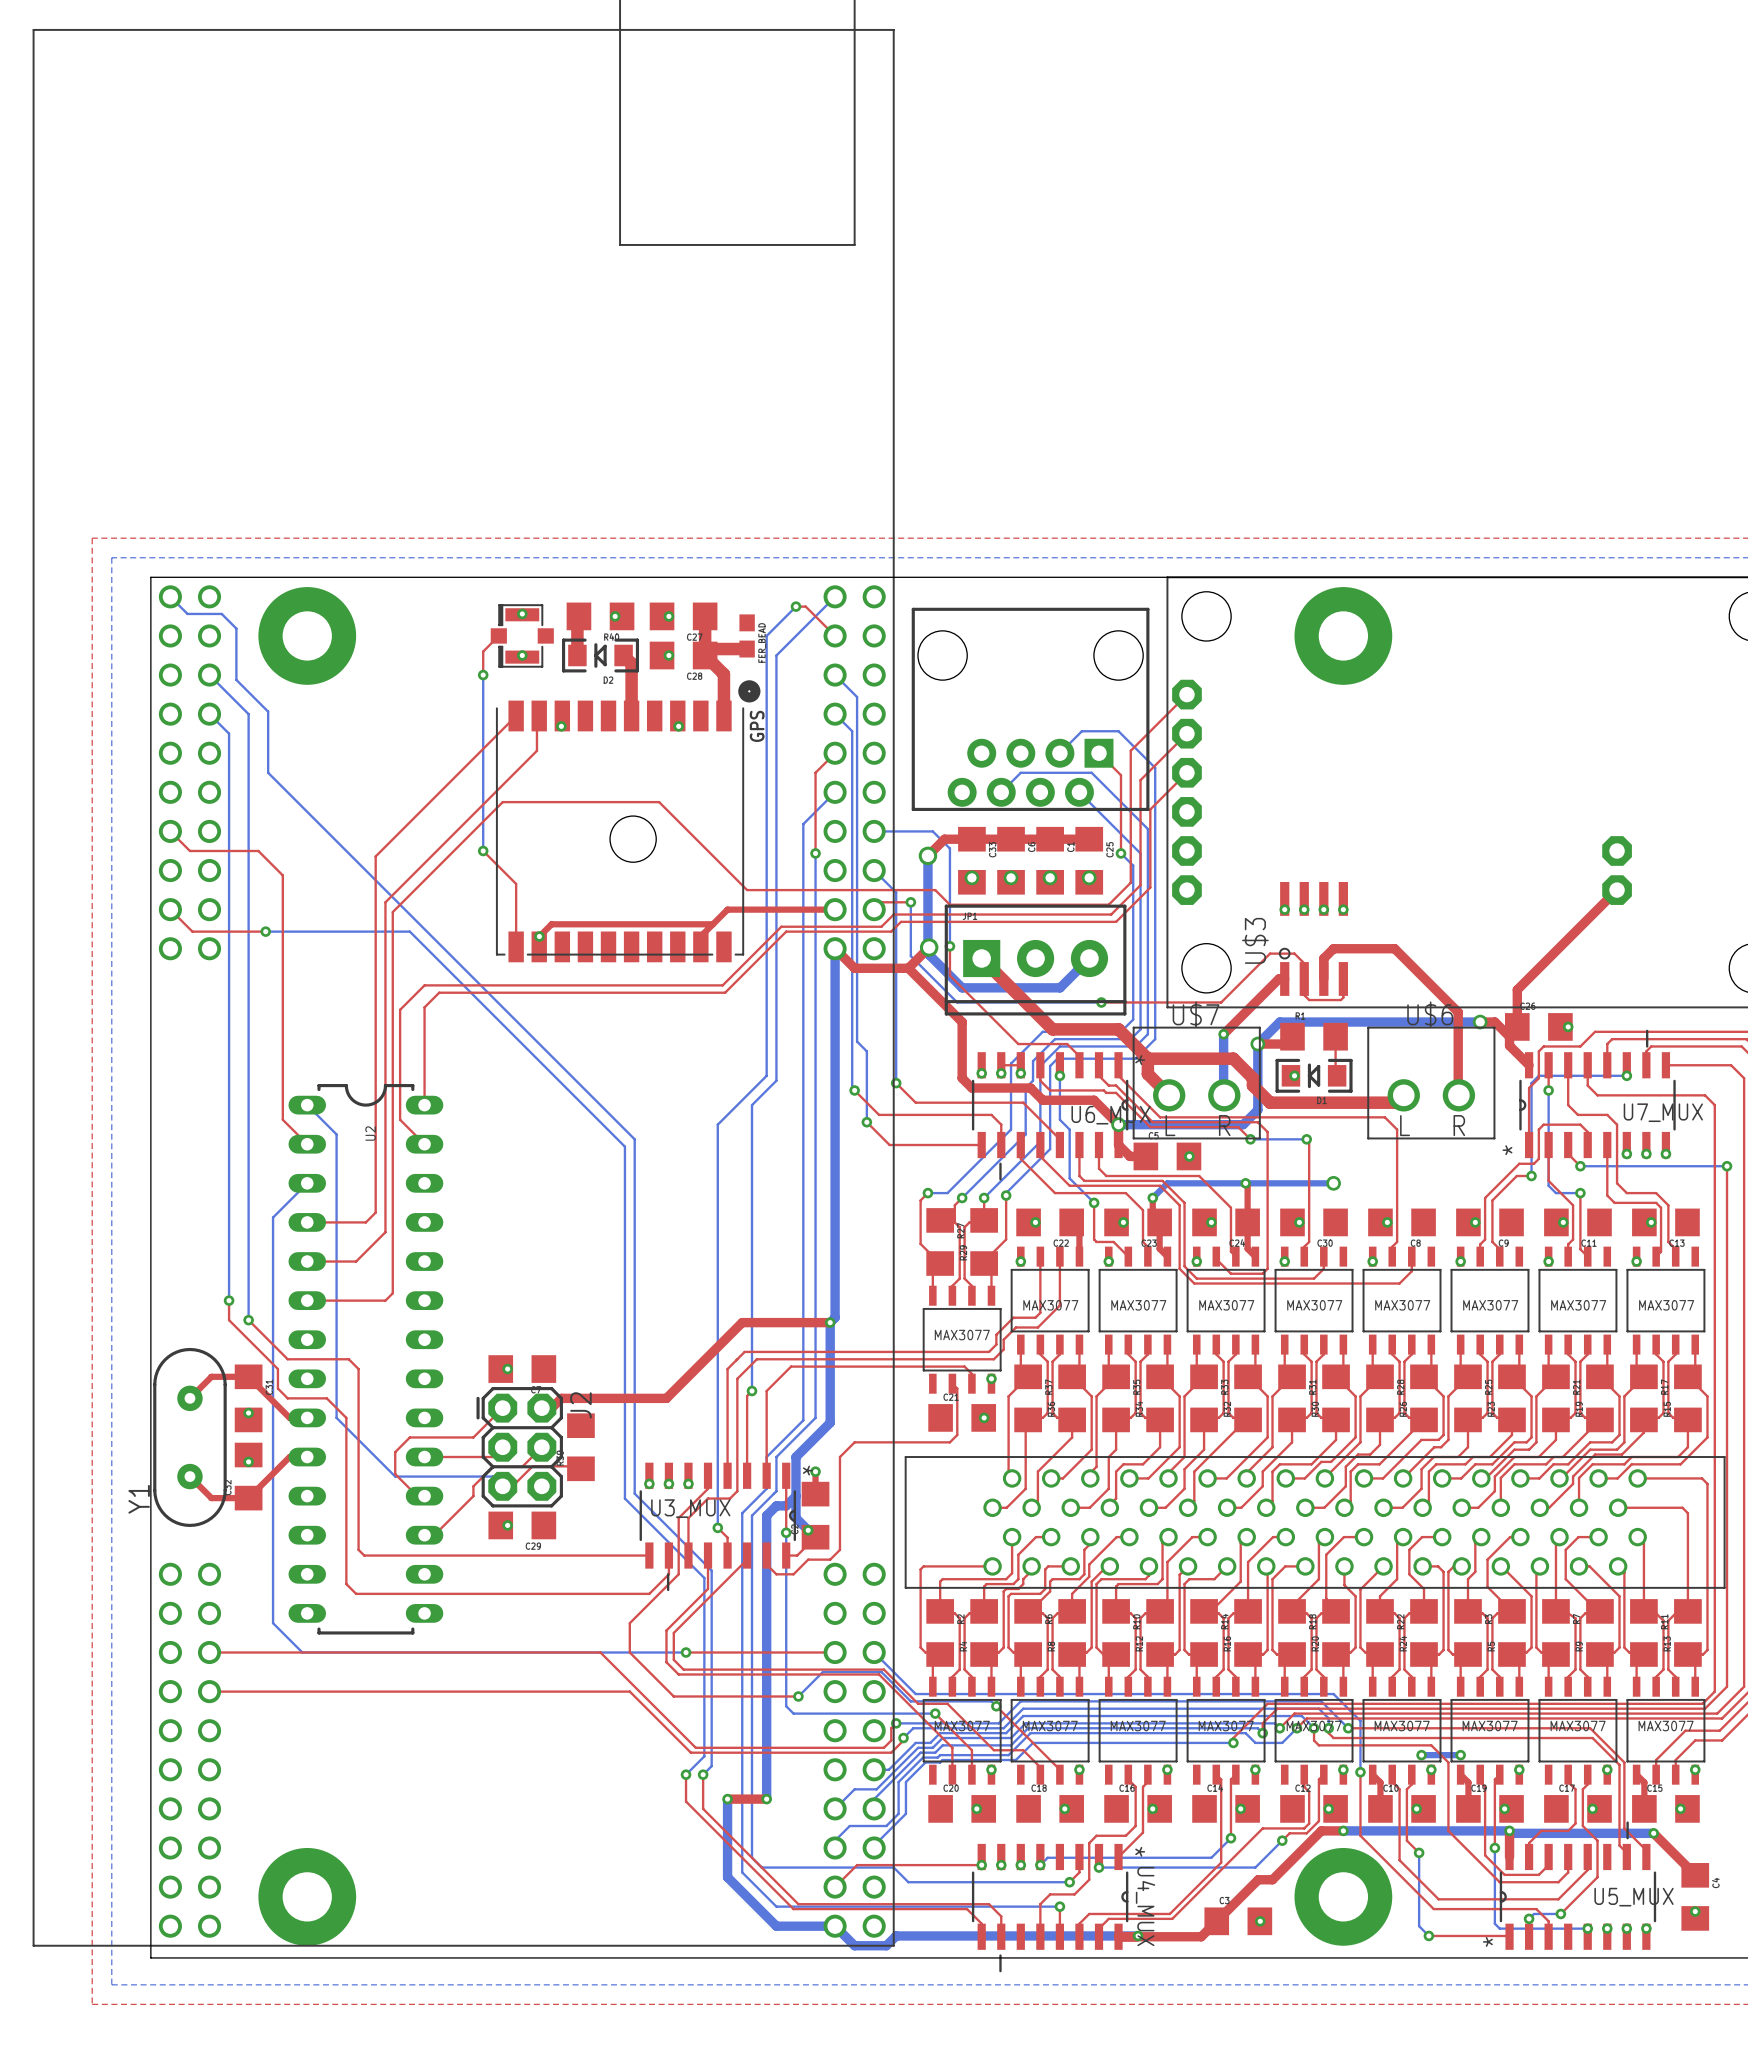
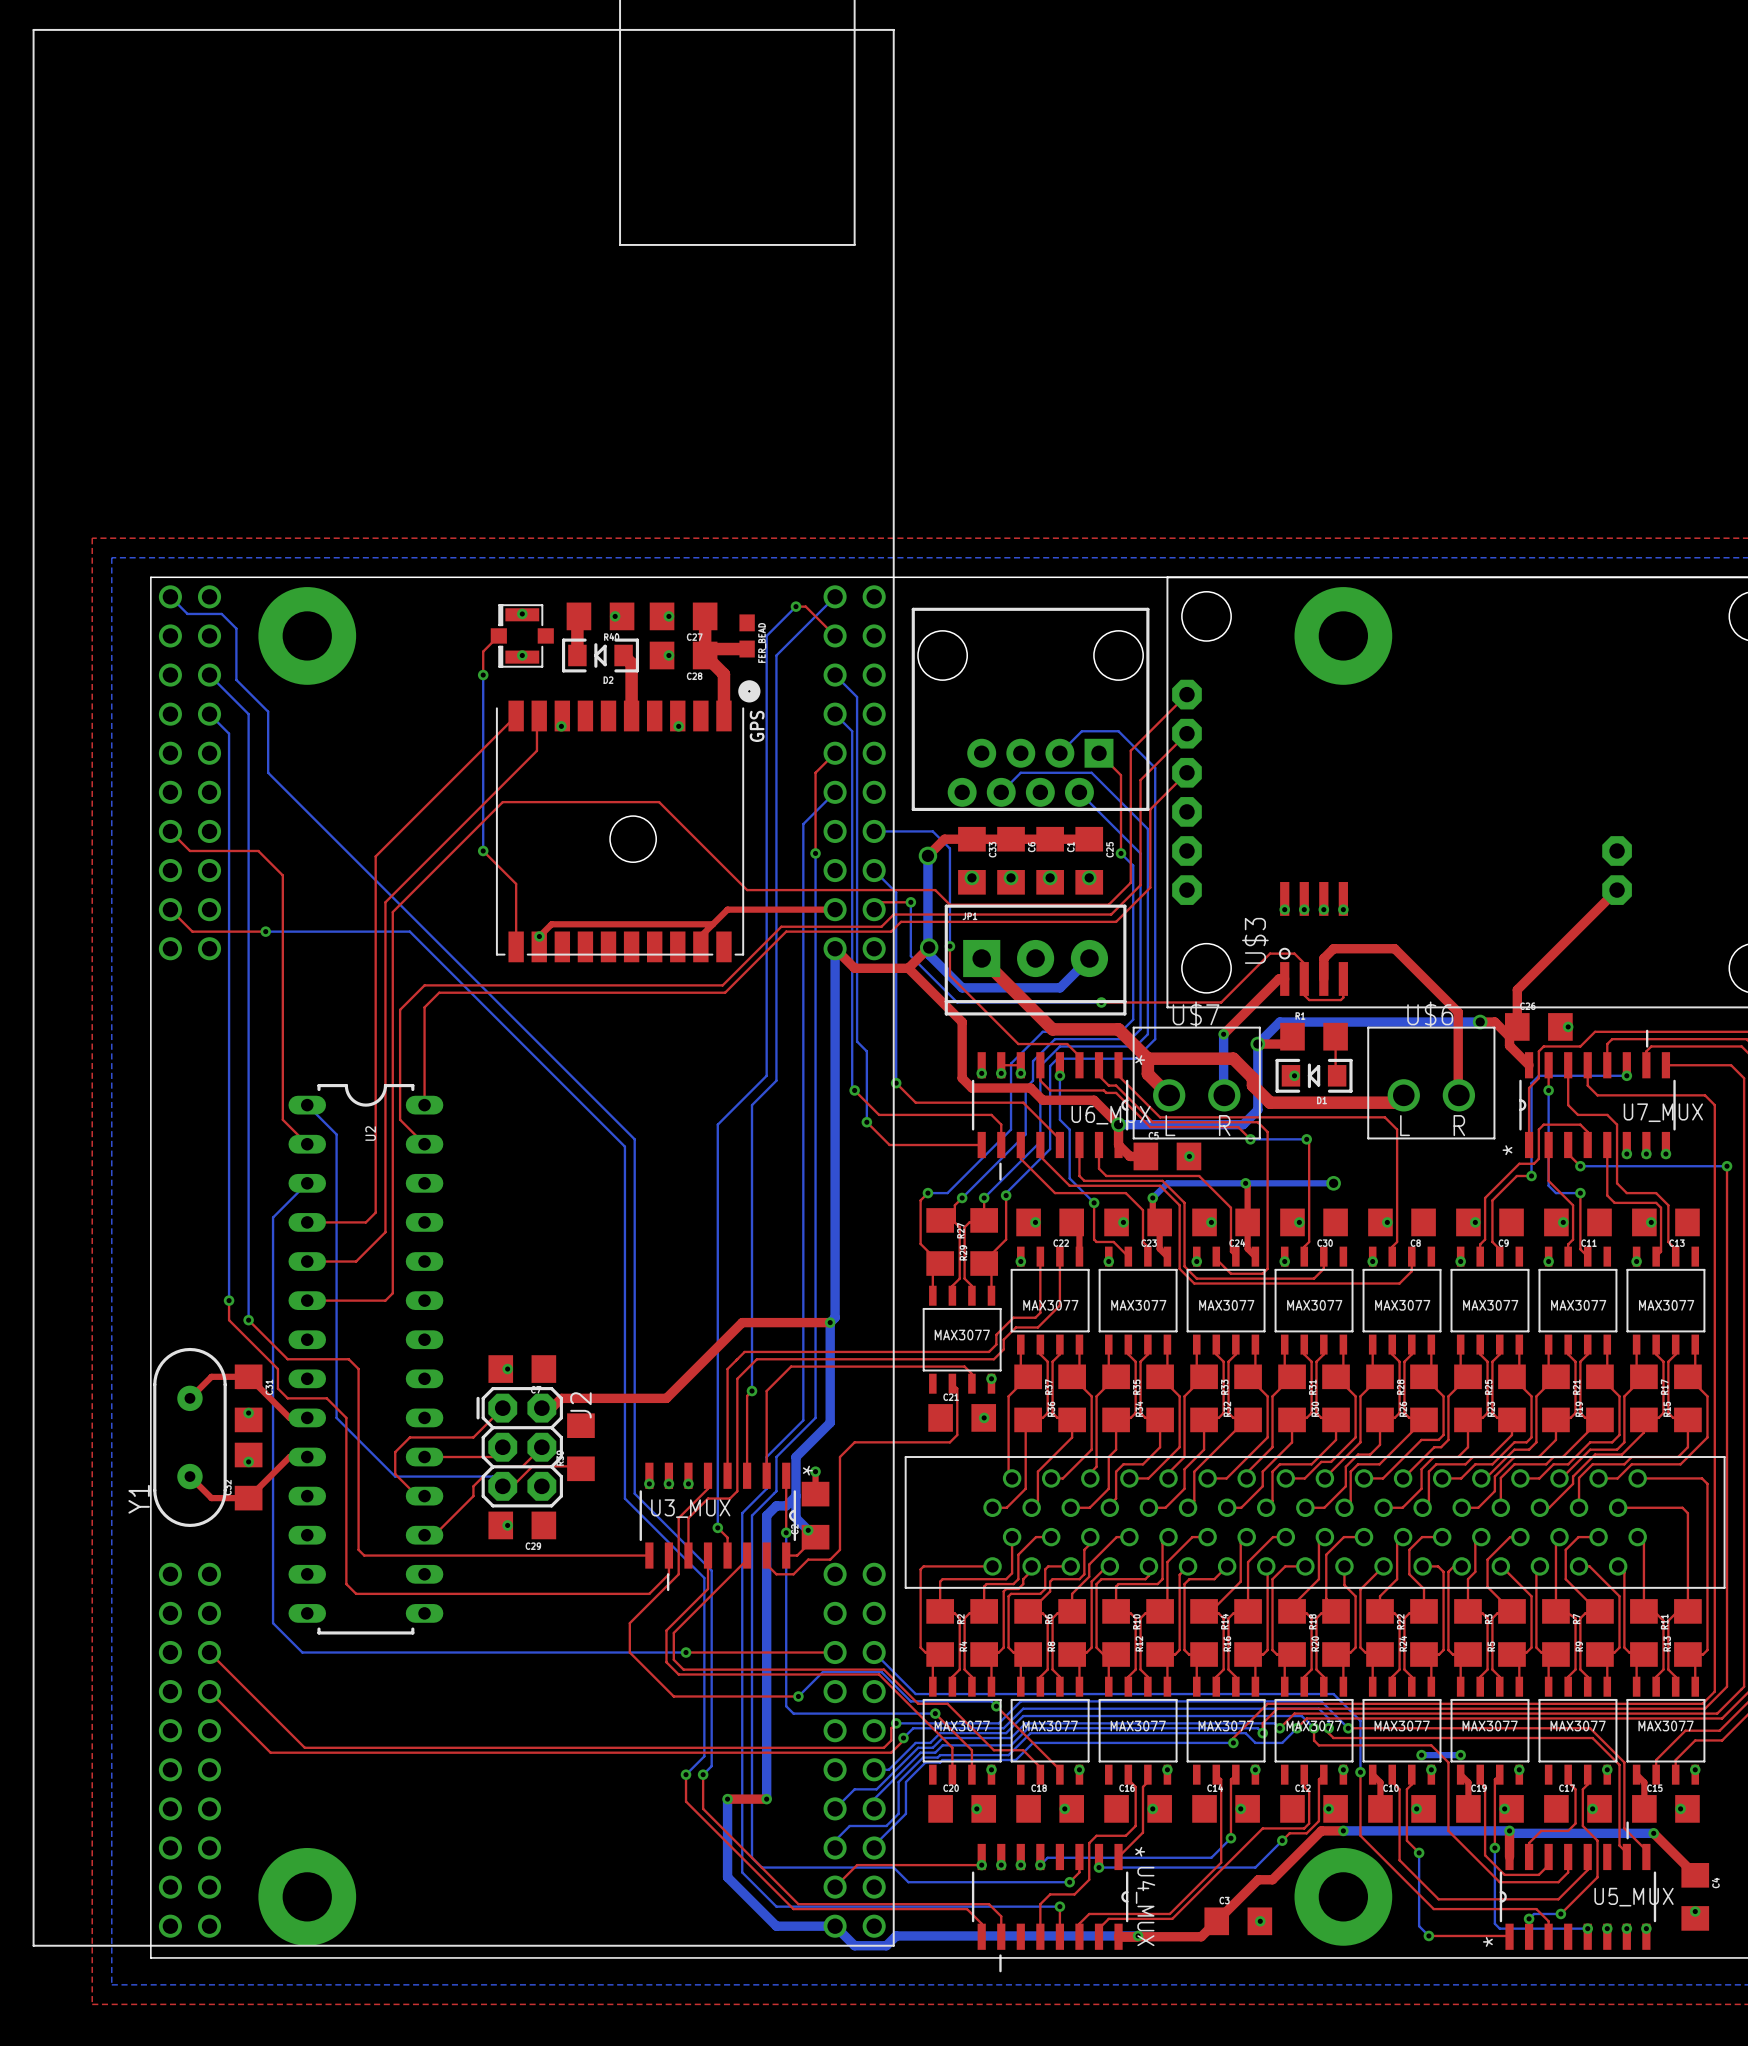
top track: (209, 1652) (600, 1652) (695, 1747) -> (209, 1652) (304, 1747) (695, 1747)
top track: (209, 1691) (629, 1691) (690, 1752) -> (209, 1691) (270, 1752) (690, 1752)

